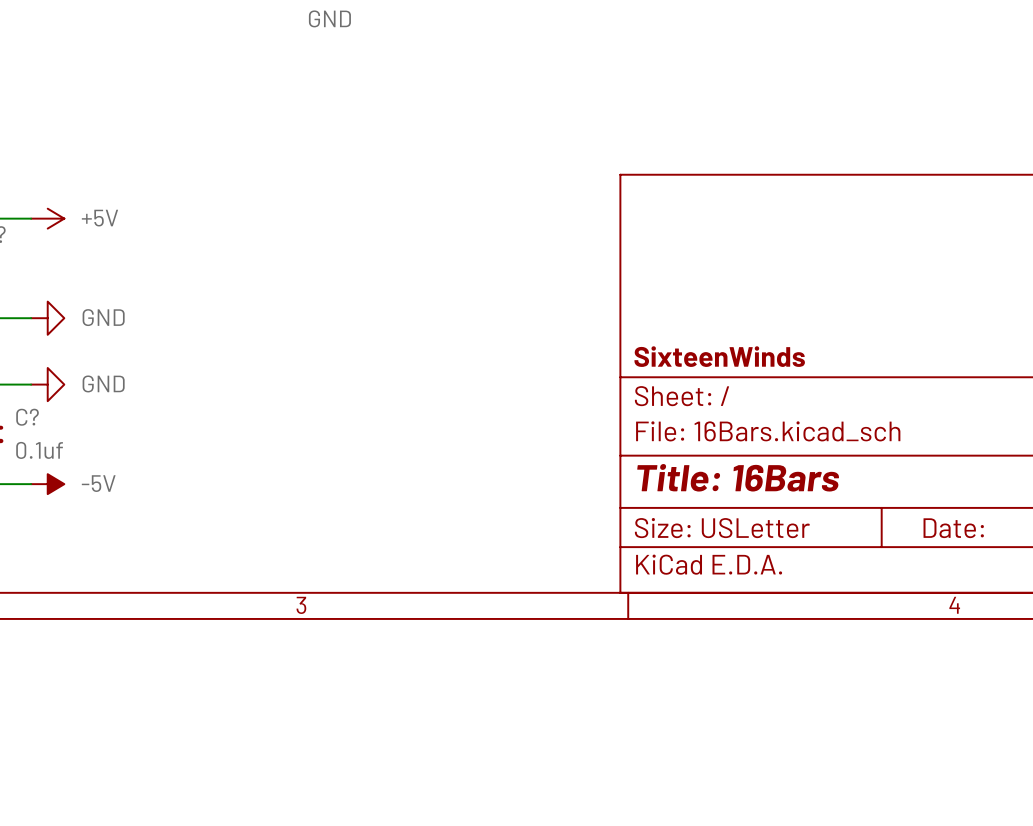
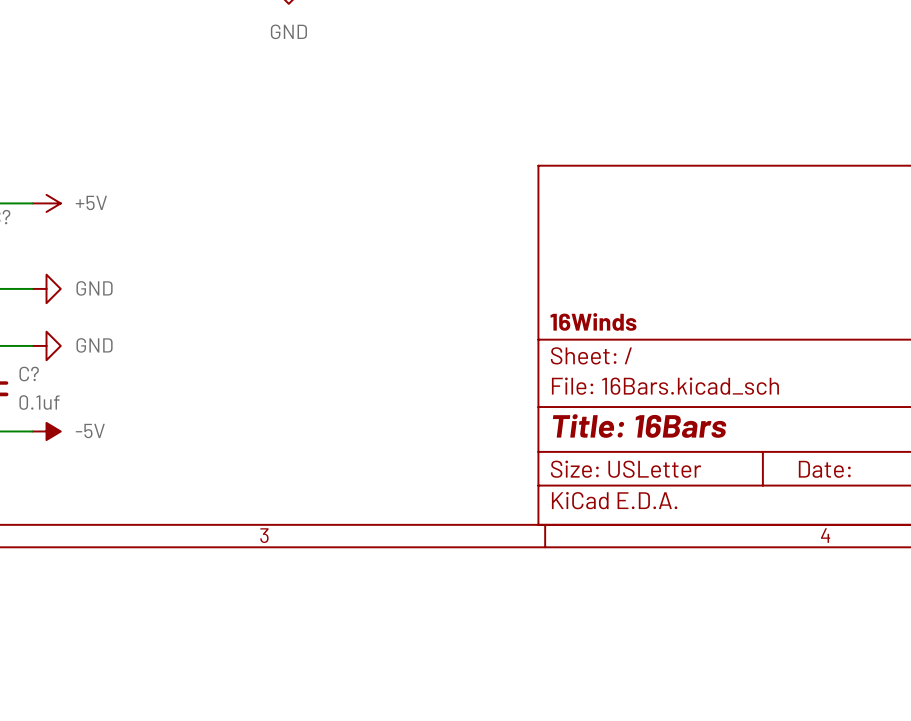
title block: SixteenWinds (719, 356) -> 16Winds (593, 321)

